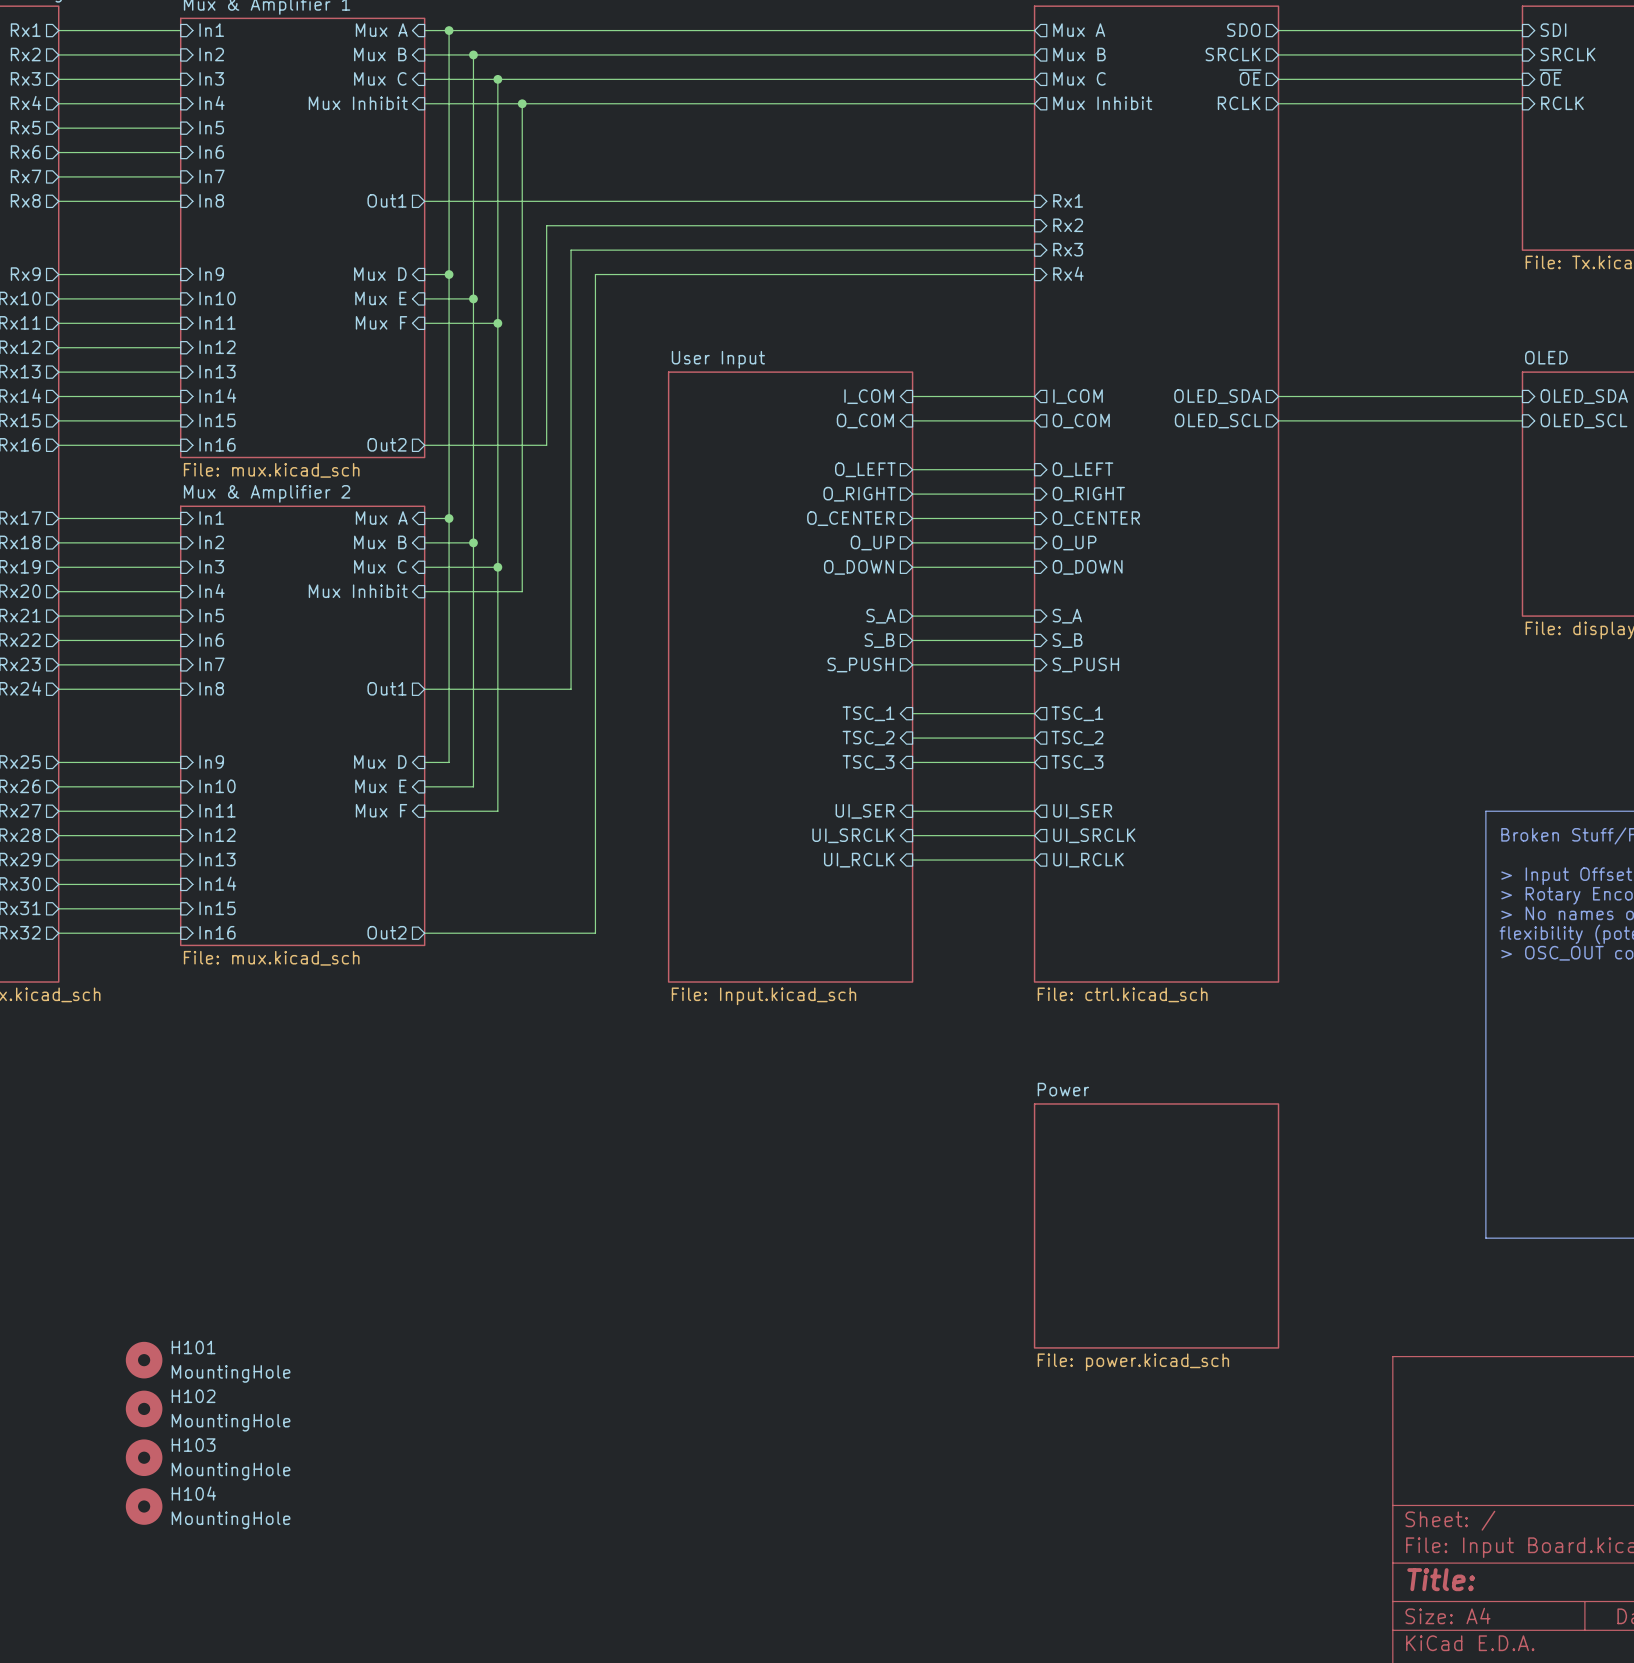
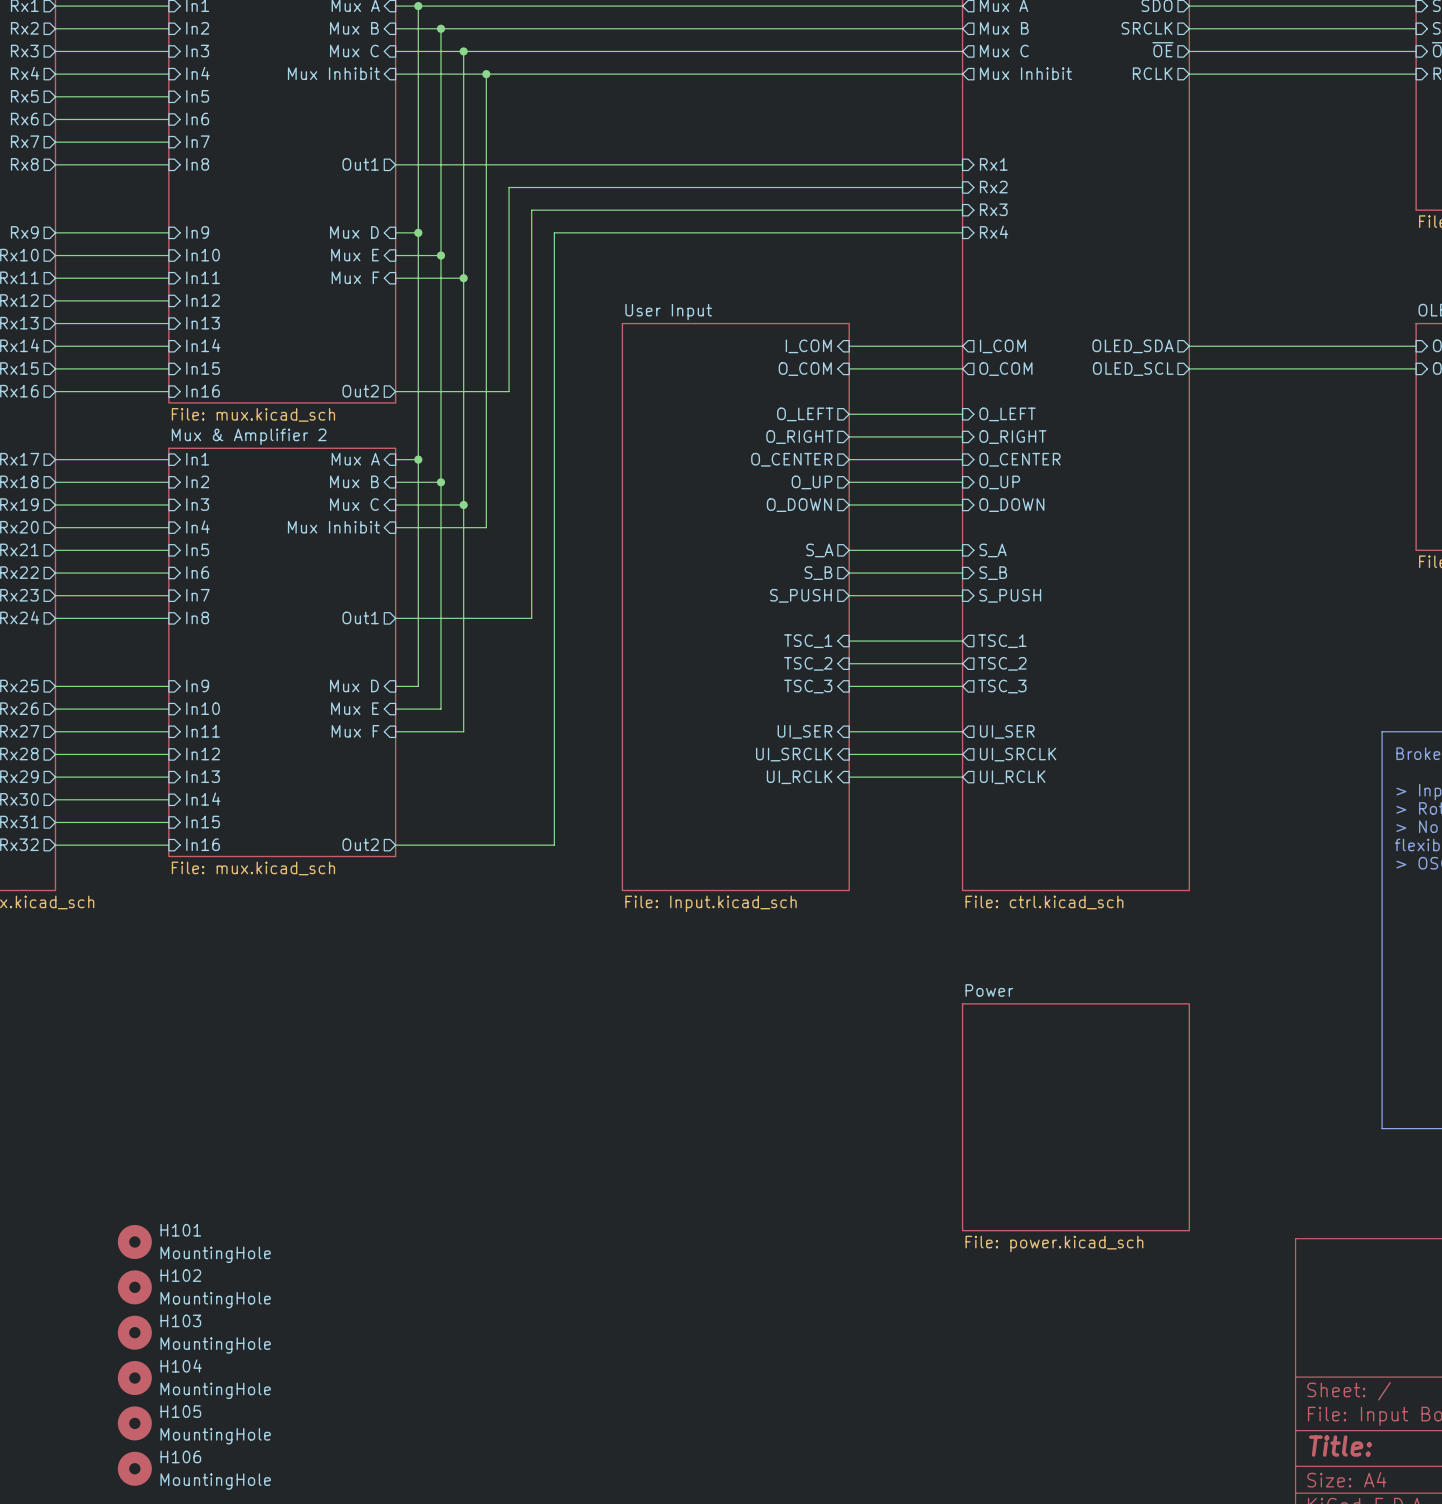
H105: none -> MountingHole (134, 1423)
H106: none -> MountingHole (134, 1468)

